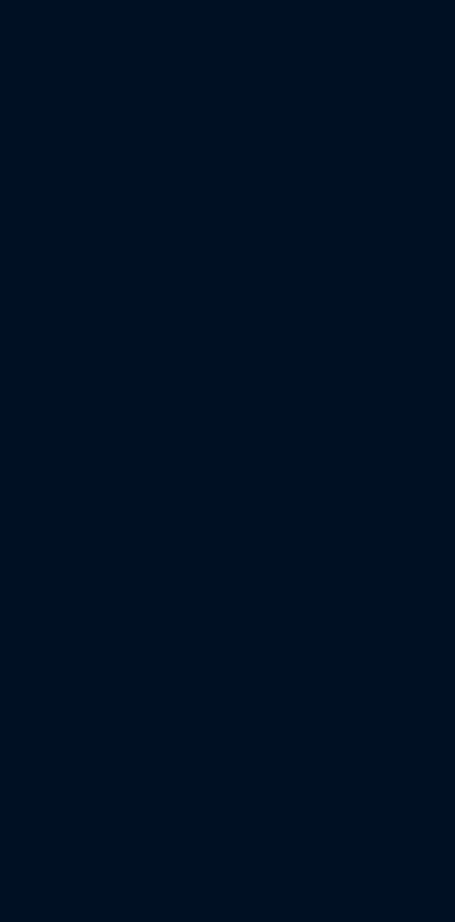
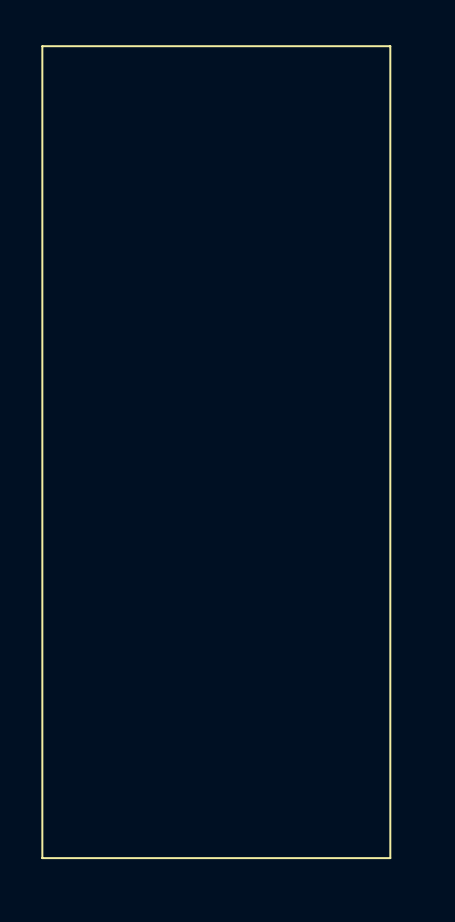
line: none -> (42, 46) (390, 46) (390, 858) (42, 858) (42, 46)

